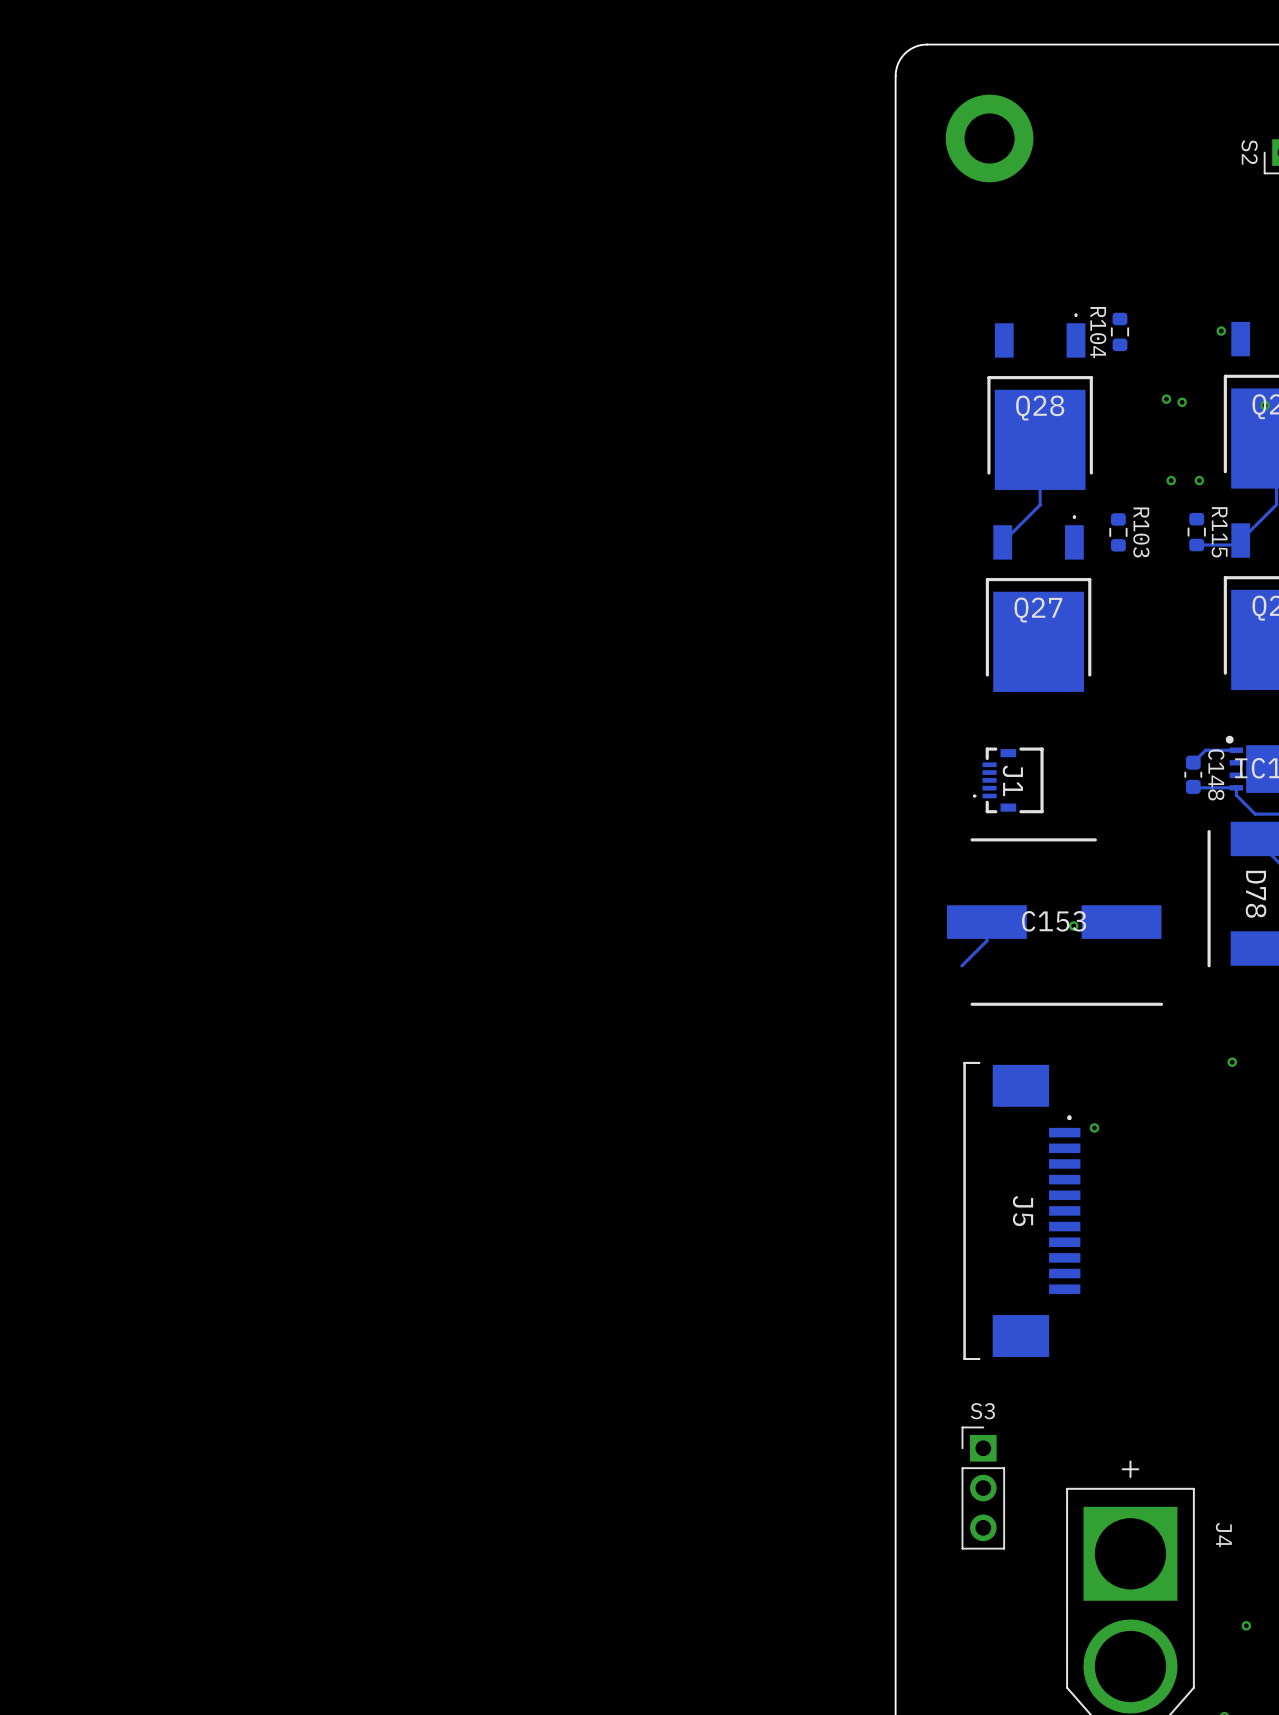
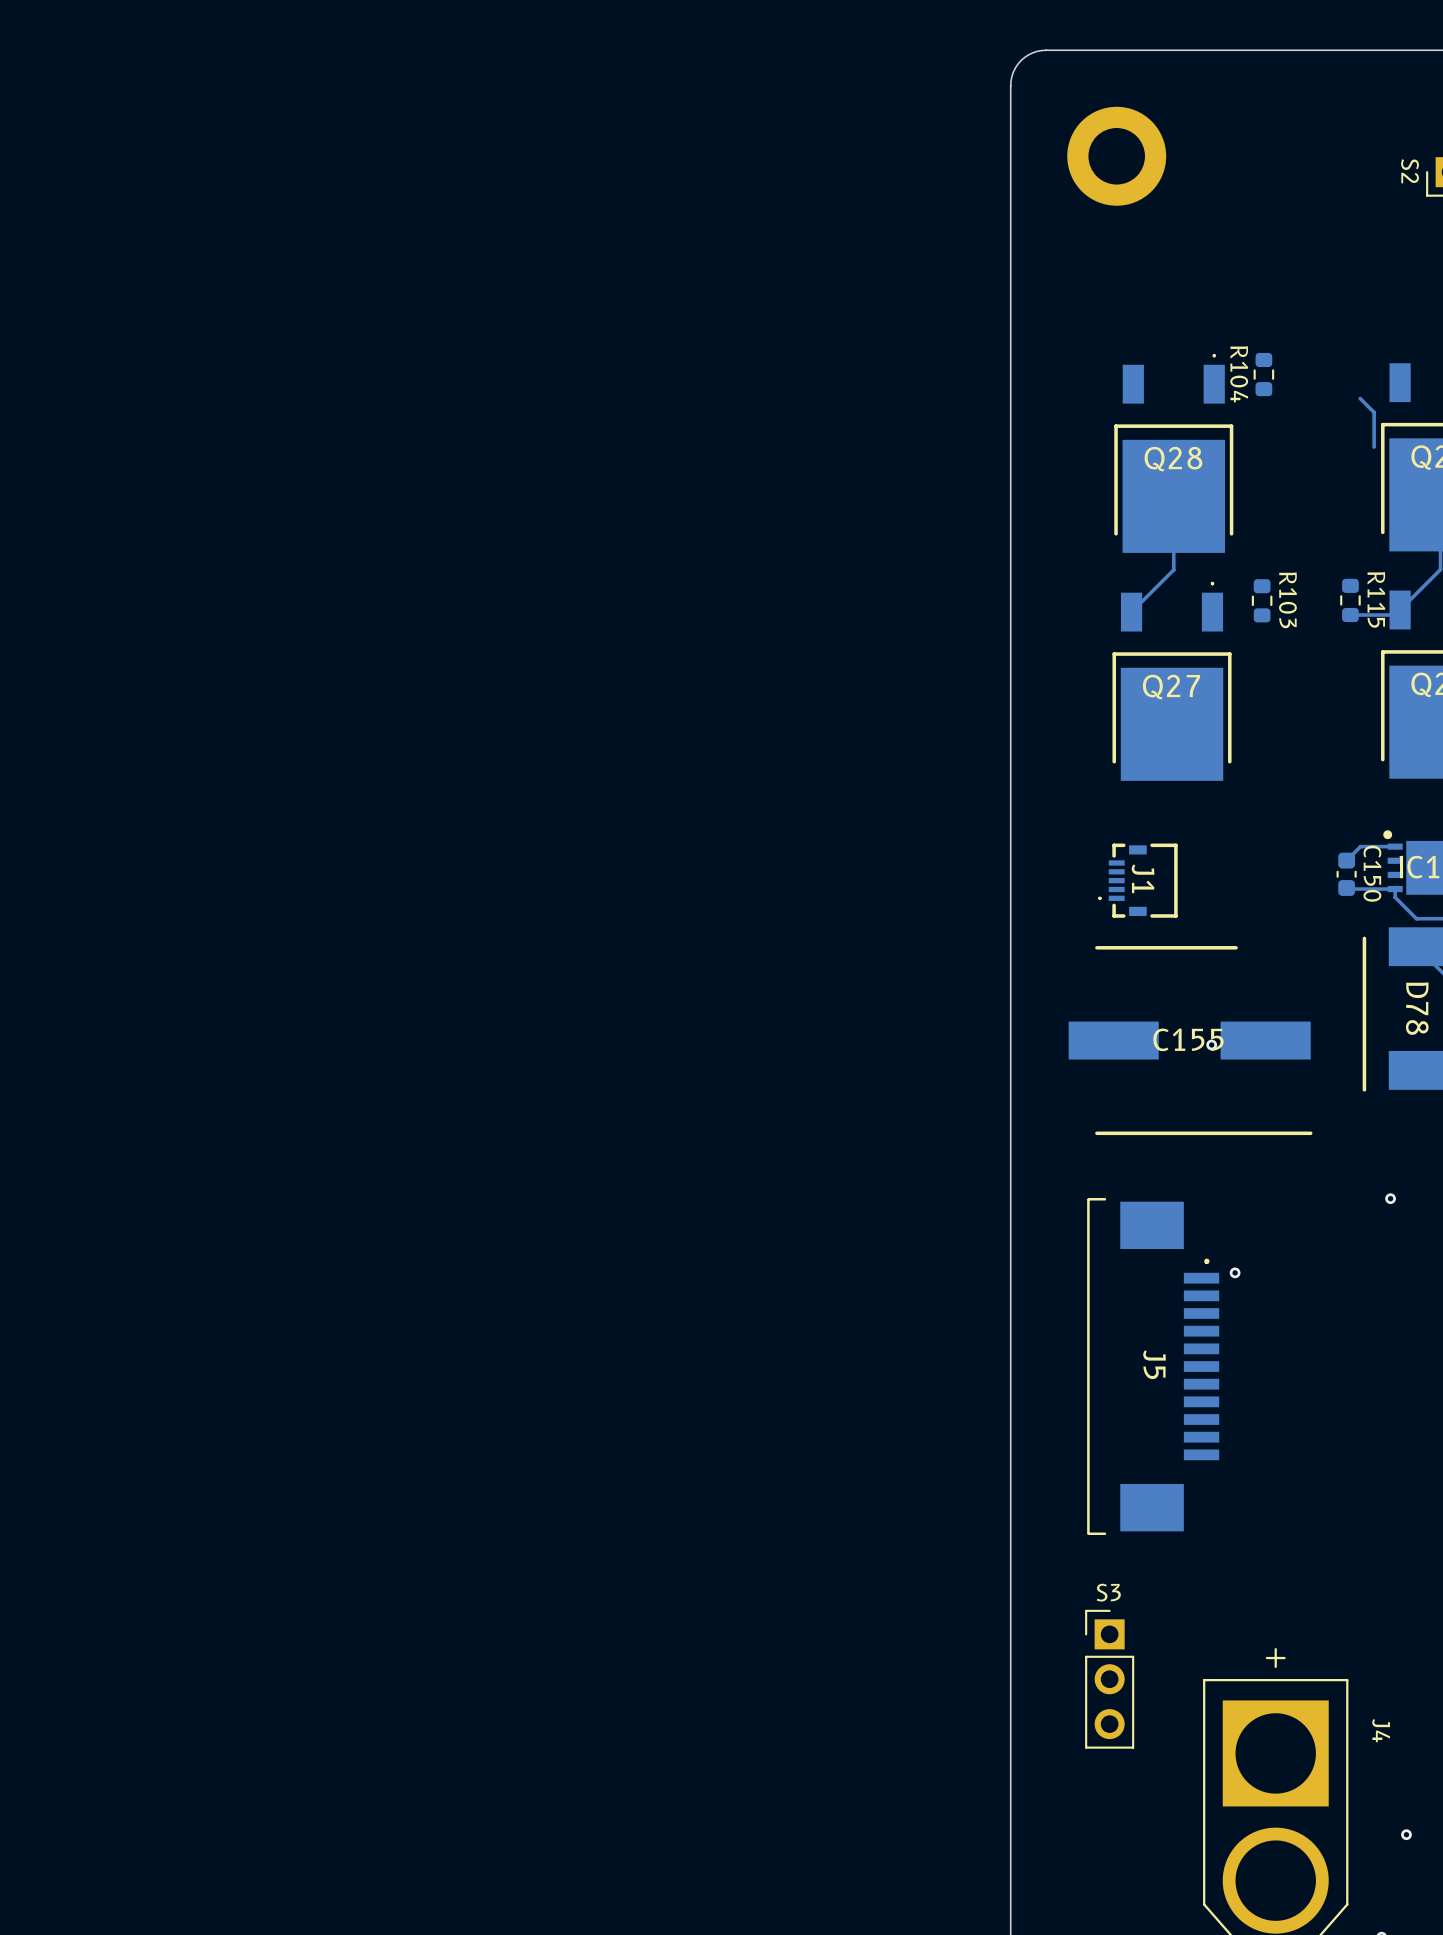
via: (1221, 331) -> none
track: none -> (1360, 398) (1374, 412) (1374, 447)
via: (1166, 399) -> none
via: (1182, 402) -> none
via: (1265, 405) -> none
via: (1171, 480) -> none
via: (1199, 480) -> none
C148 name: C148 (1216, 774) -> C150 (1372, 873)
C153 name: C153 (1054, 921) -> C155 (1188, 1039)
track: (963, 922) (986, 922) (986, 940) (961, 965) -> none

